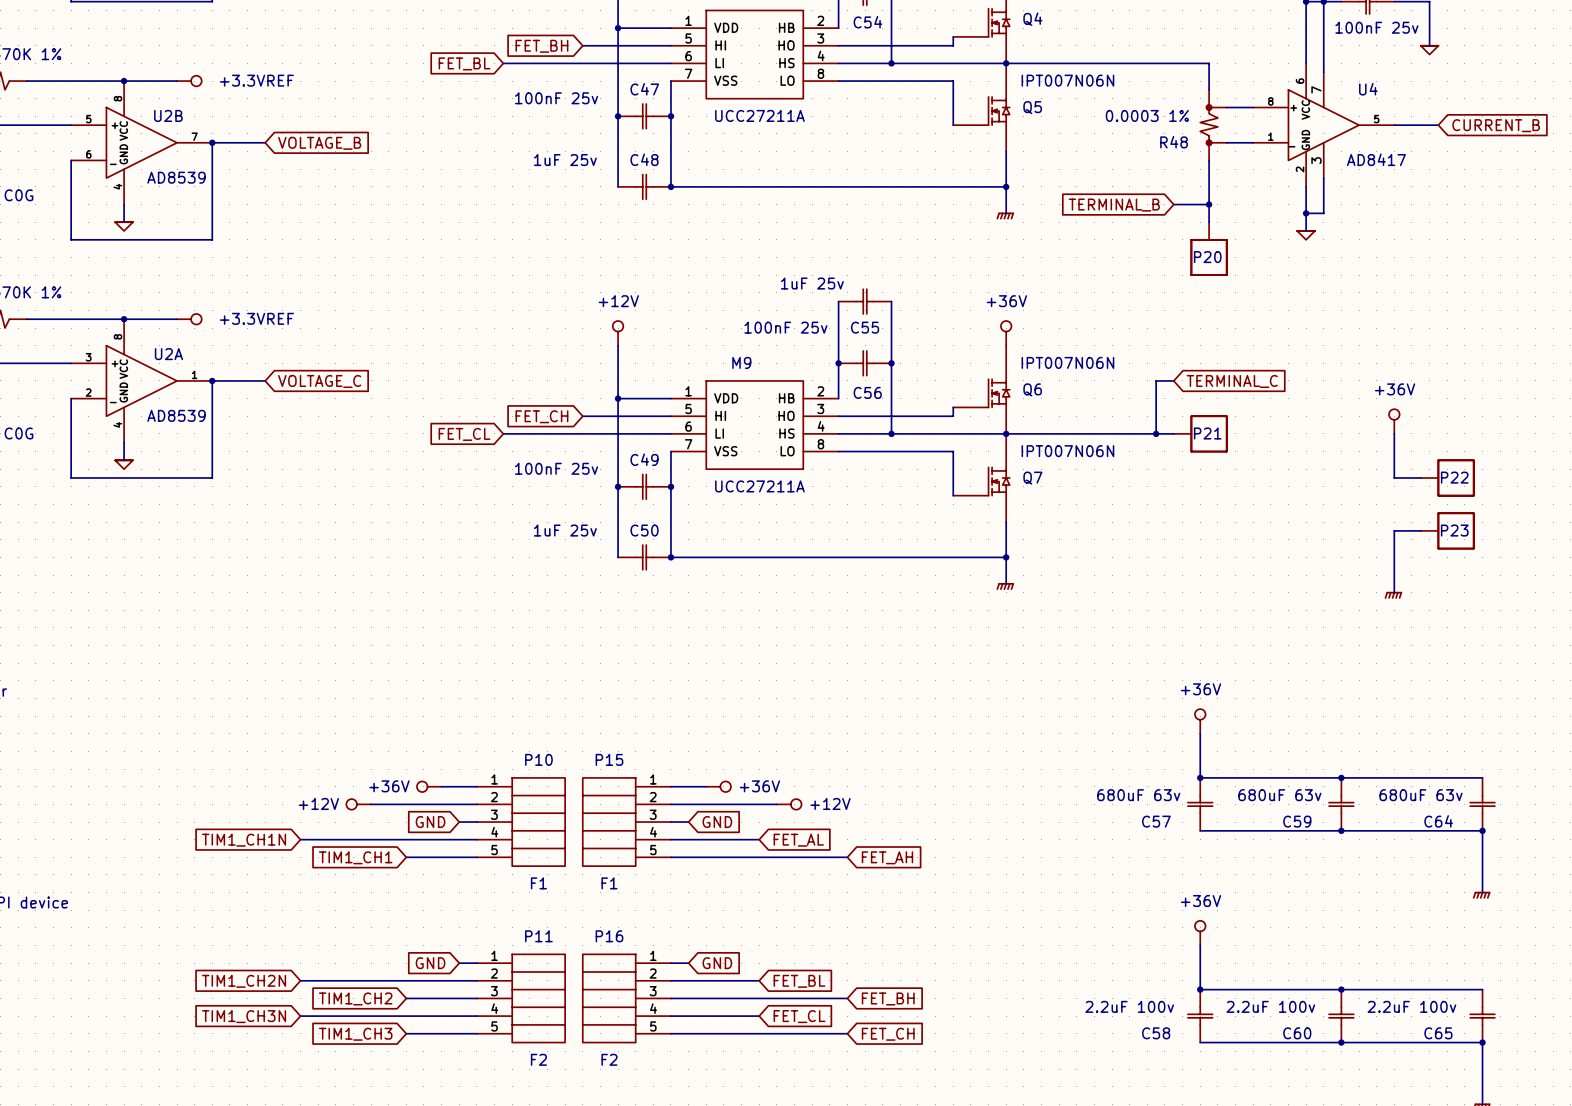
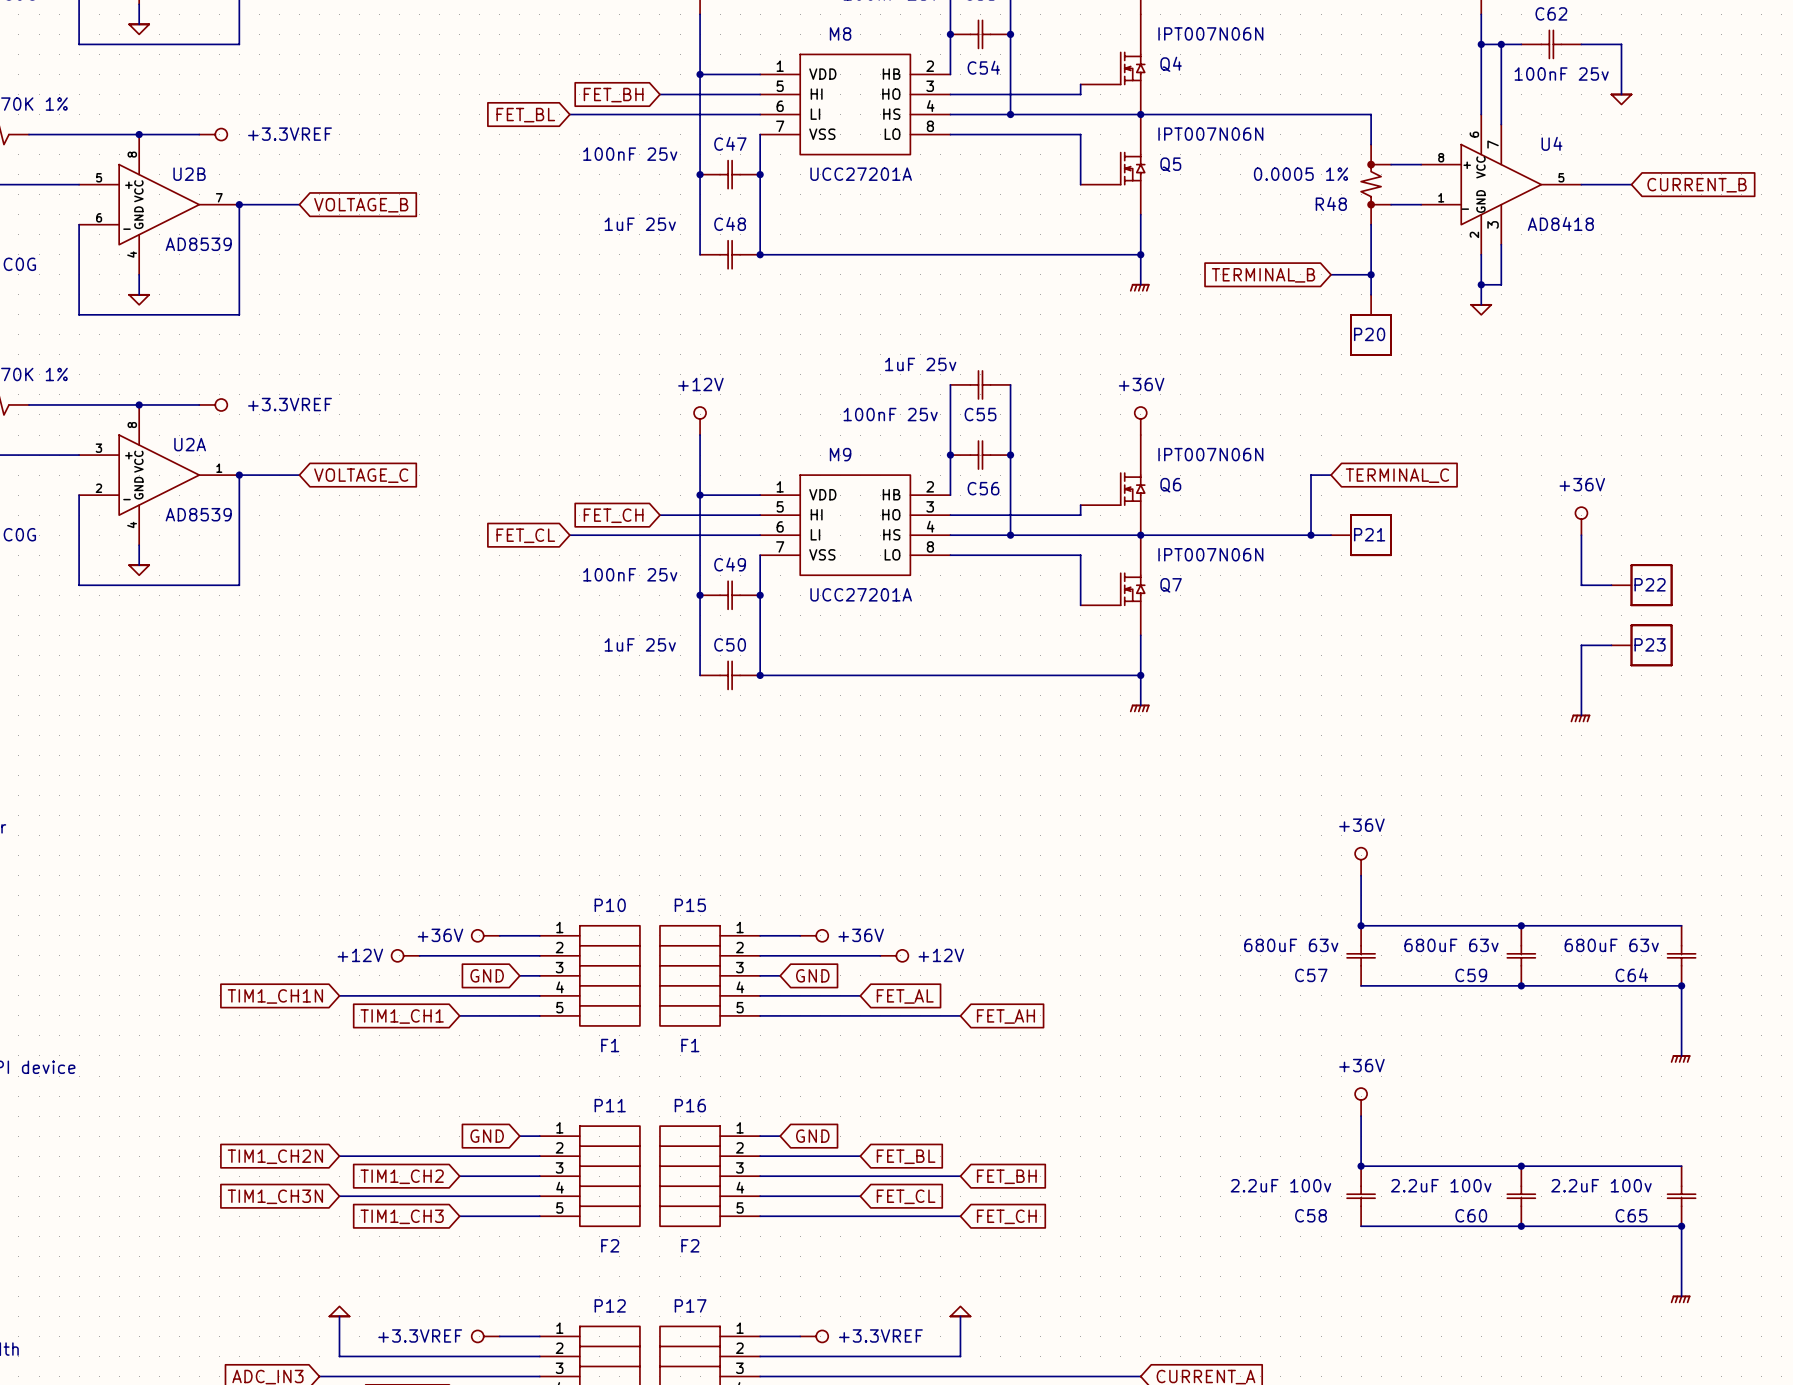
M8 value: UCC27211A (759, 115) -> UCC27201A (861, 174)
R48 value: 0.0003 1% (1147, 115) -> 0.0005 1% (1300, 174)
U4 value: AD8417 (1376, 159) -> AD8418 (1560, 223)
M9 value: UCC27211A (759, 486) -> UCC27201A (861, 594)

